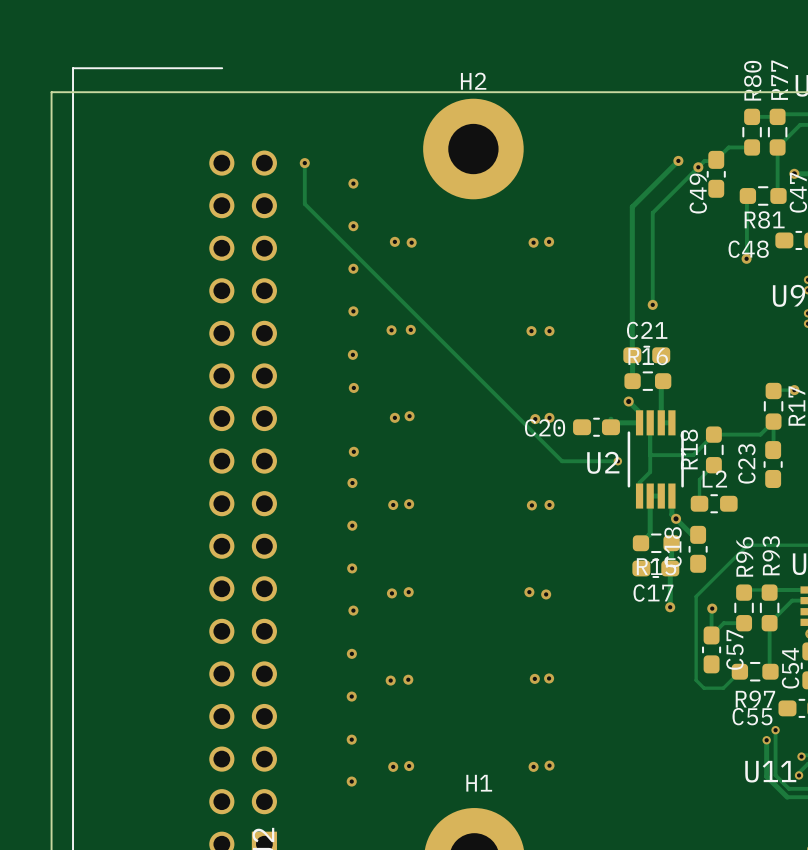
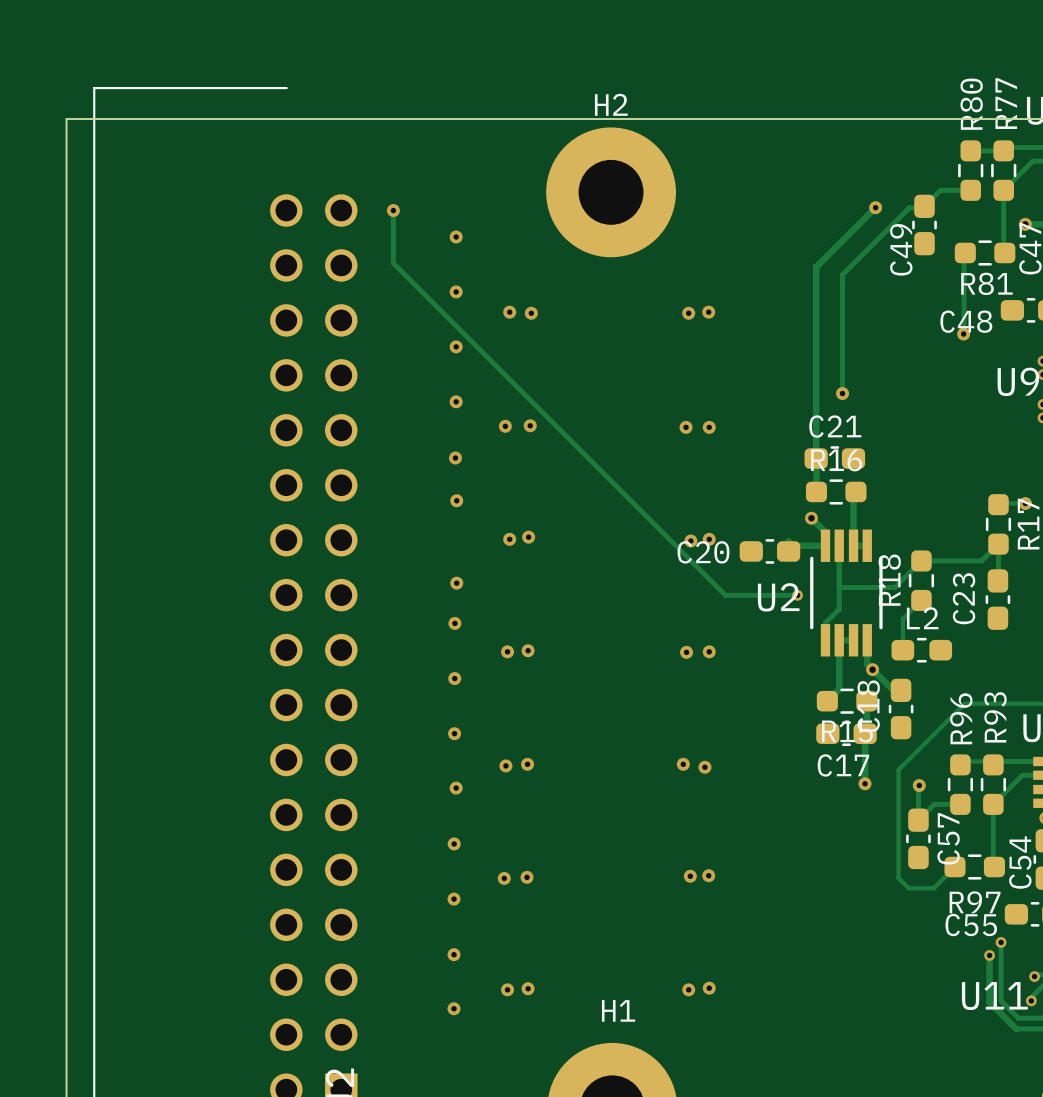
via: (698, 167) -> none

